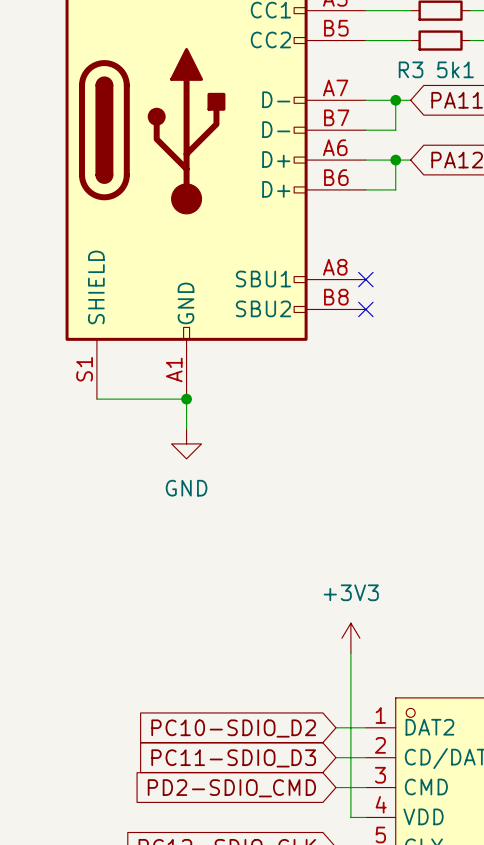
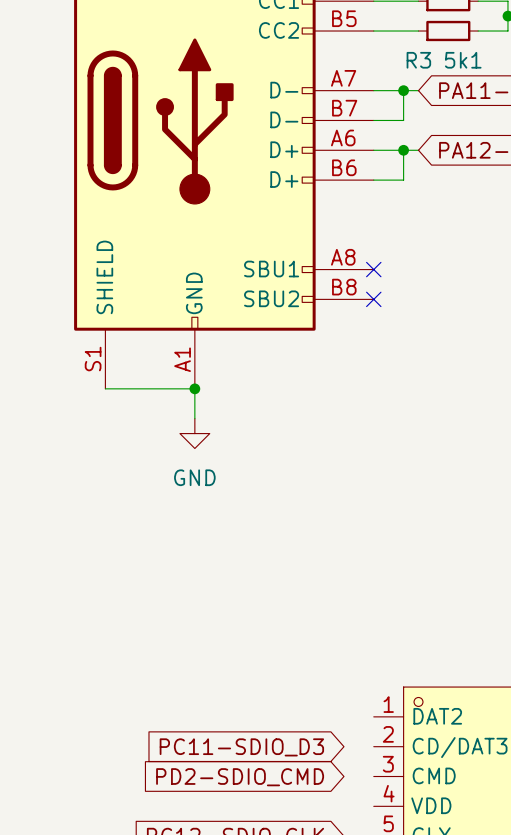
power symbol: +3V3 (350, 638) -> none
wire: (350, 653) (350, 817) (365, 817) -> none
wire: (335, 727) (365, 727) -> none
global label: PC10-SDIO_D2 (233, 728) -> none
wire: (335, 757) (365, 757) -> none
wire: (335, 787) (365, 787) -> none

